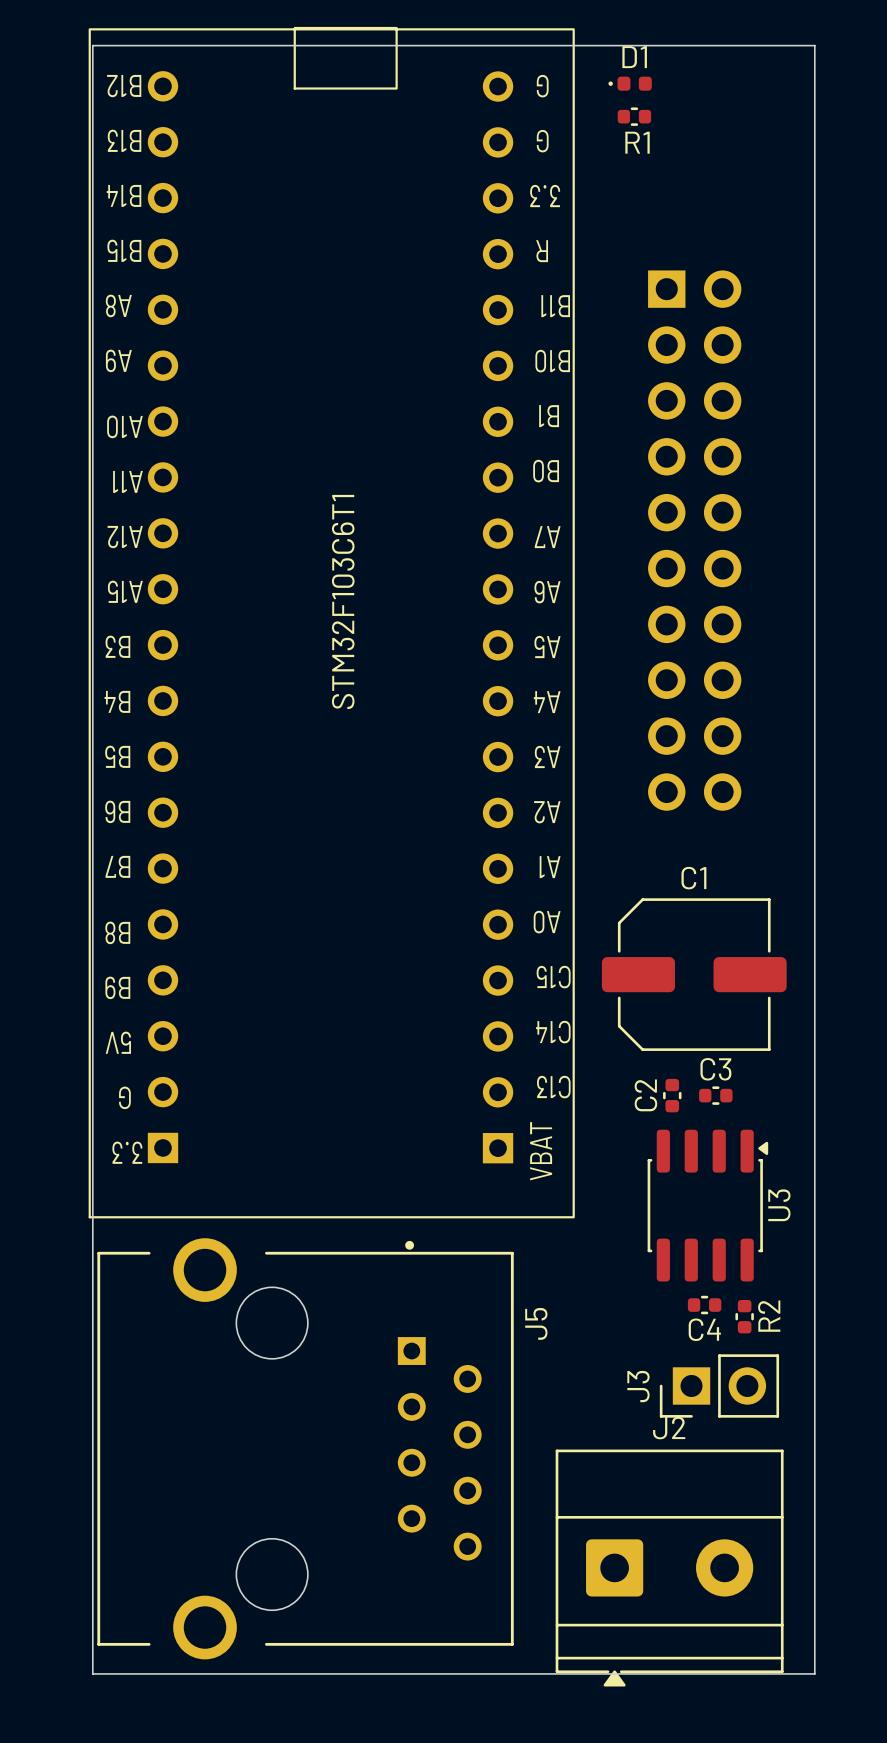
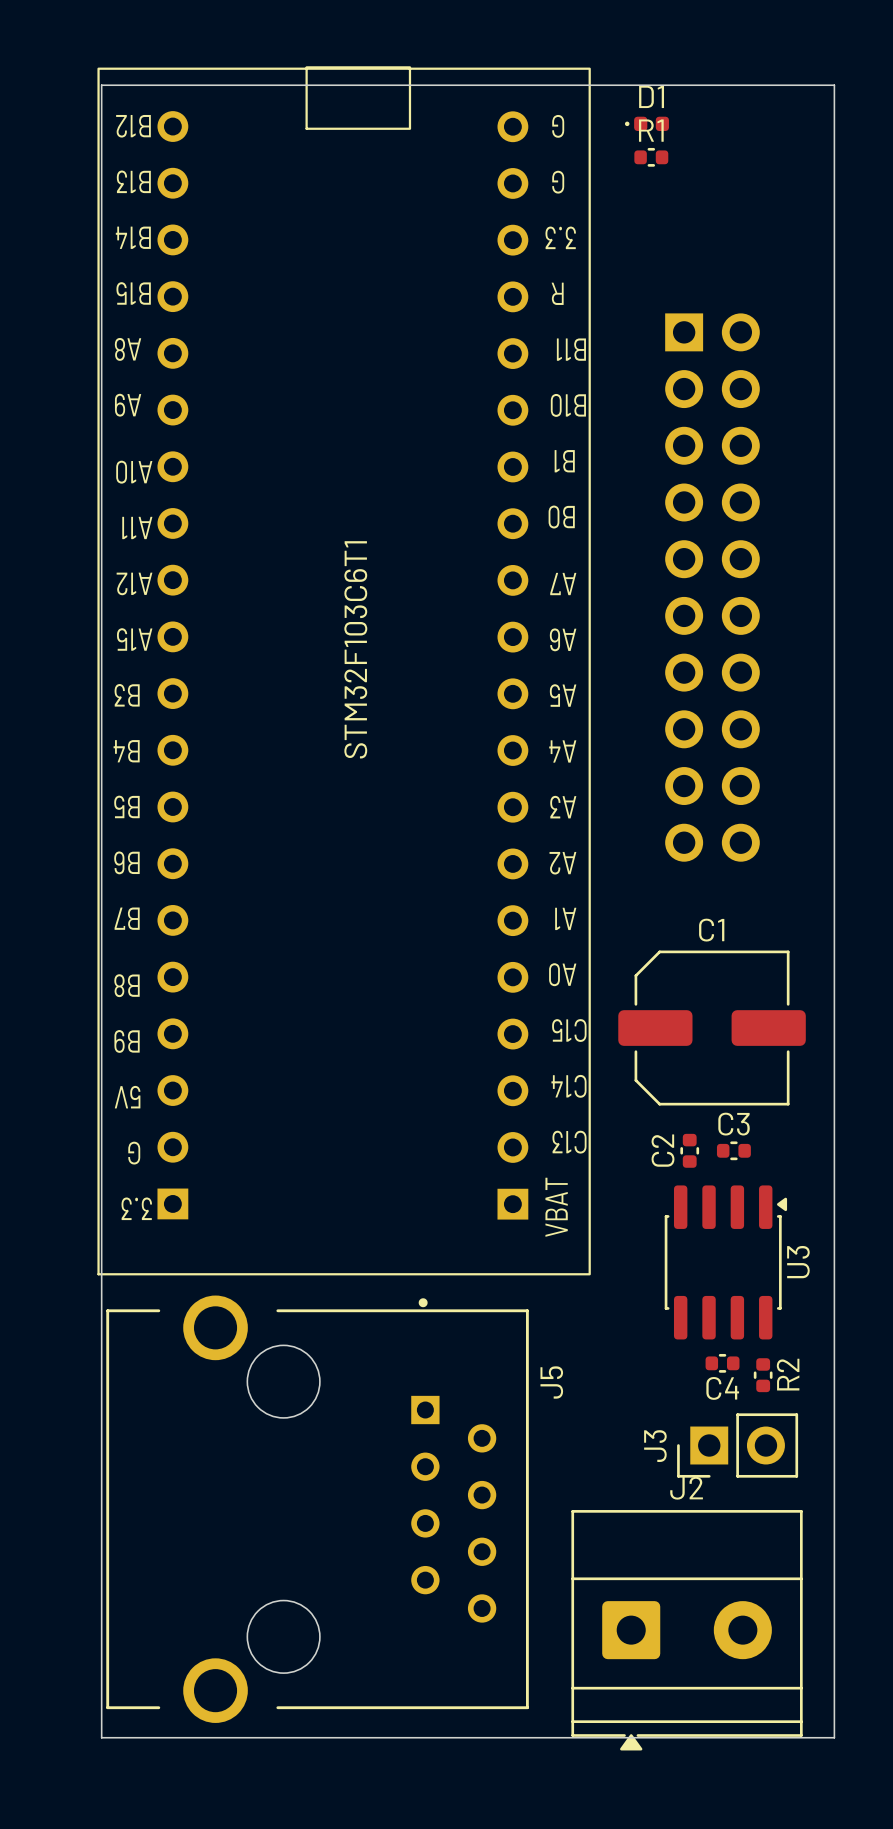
R1 name position: R1 (637, 142) -> R1 (651, 130)

